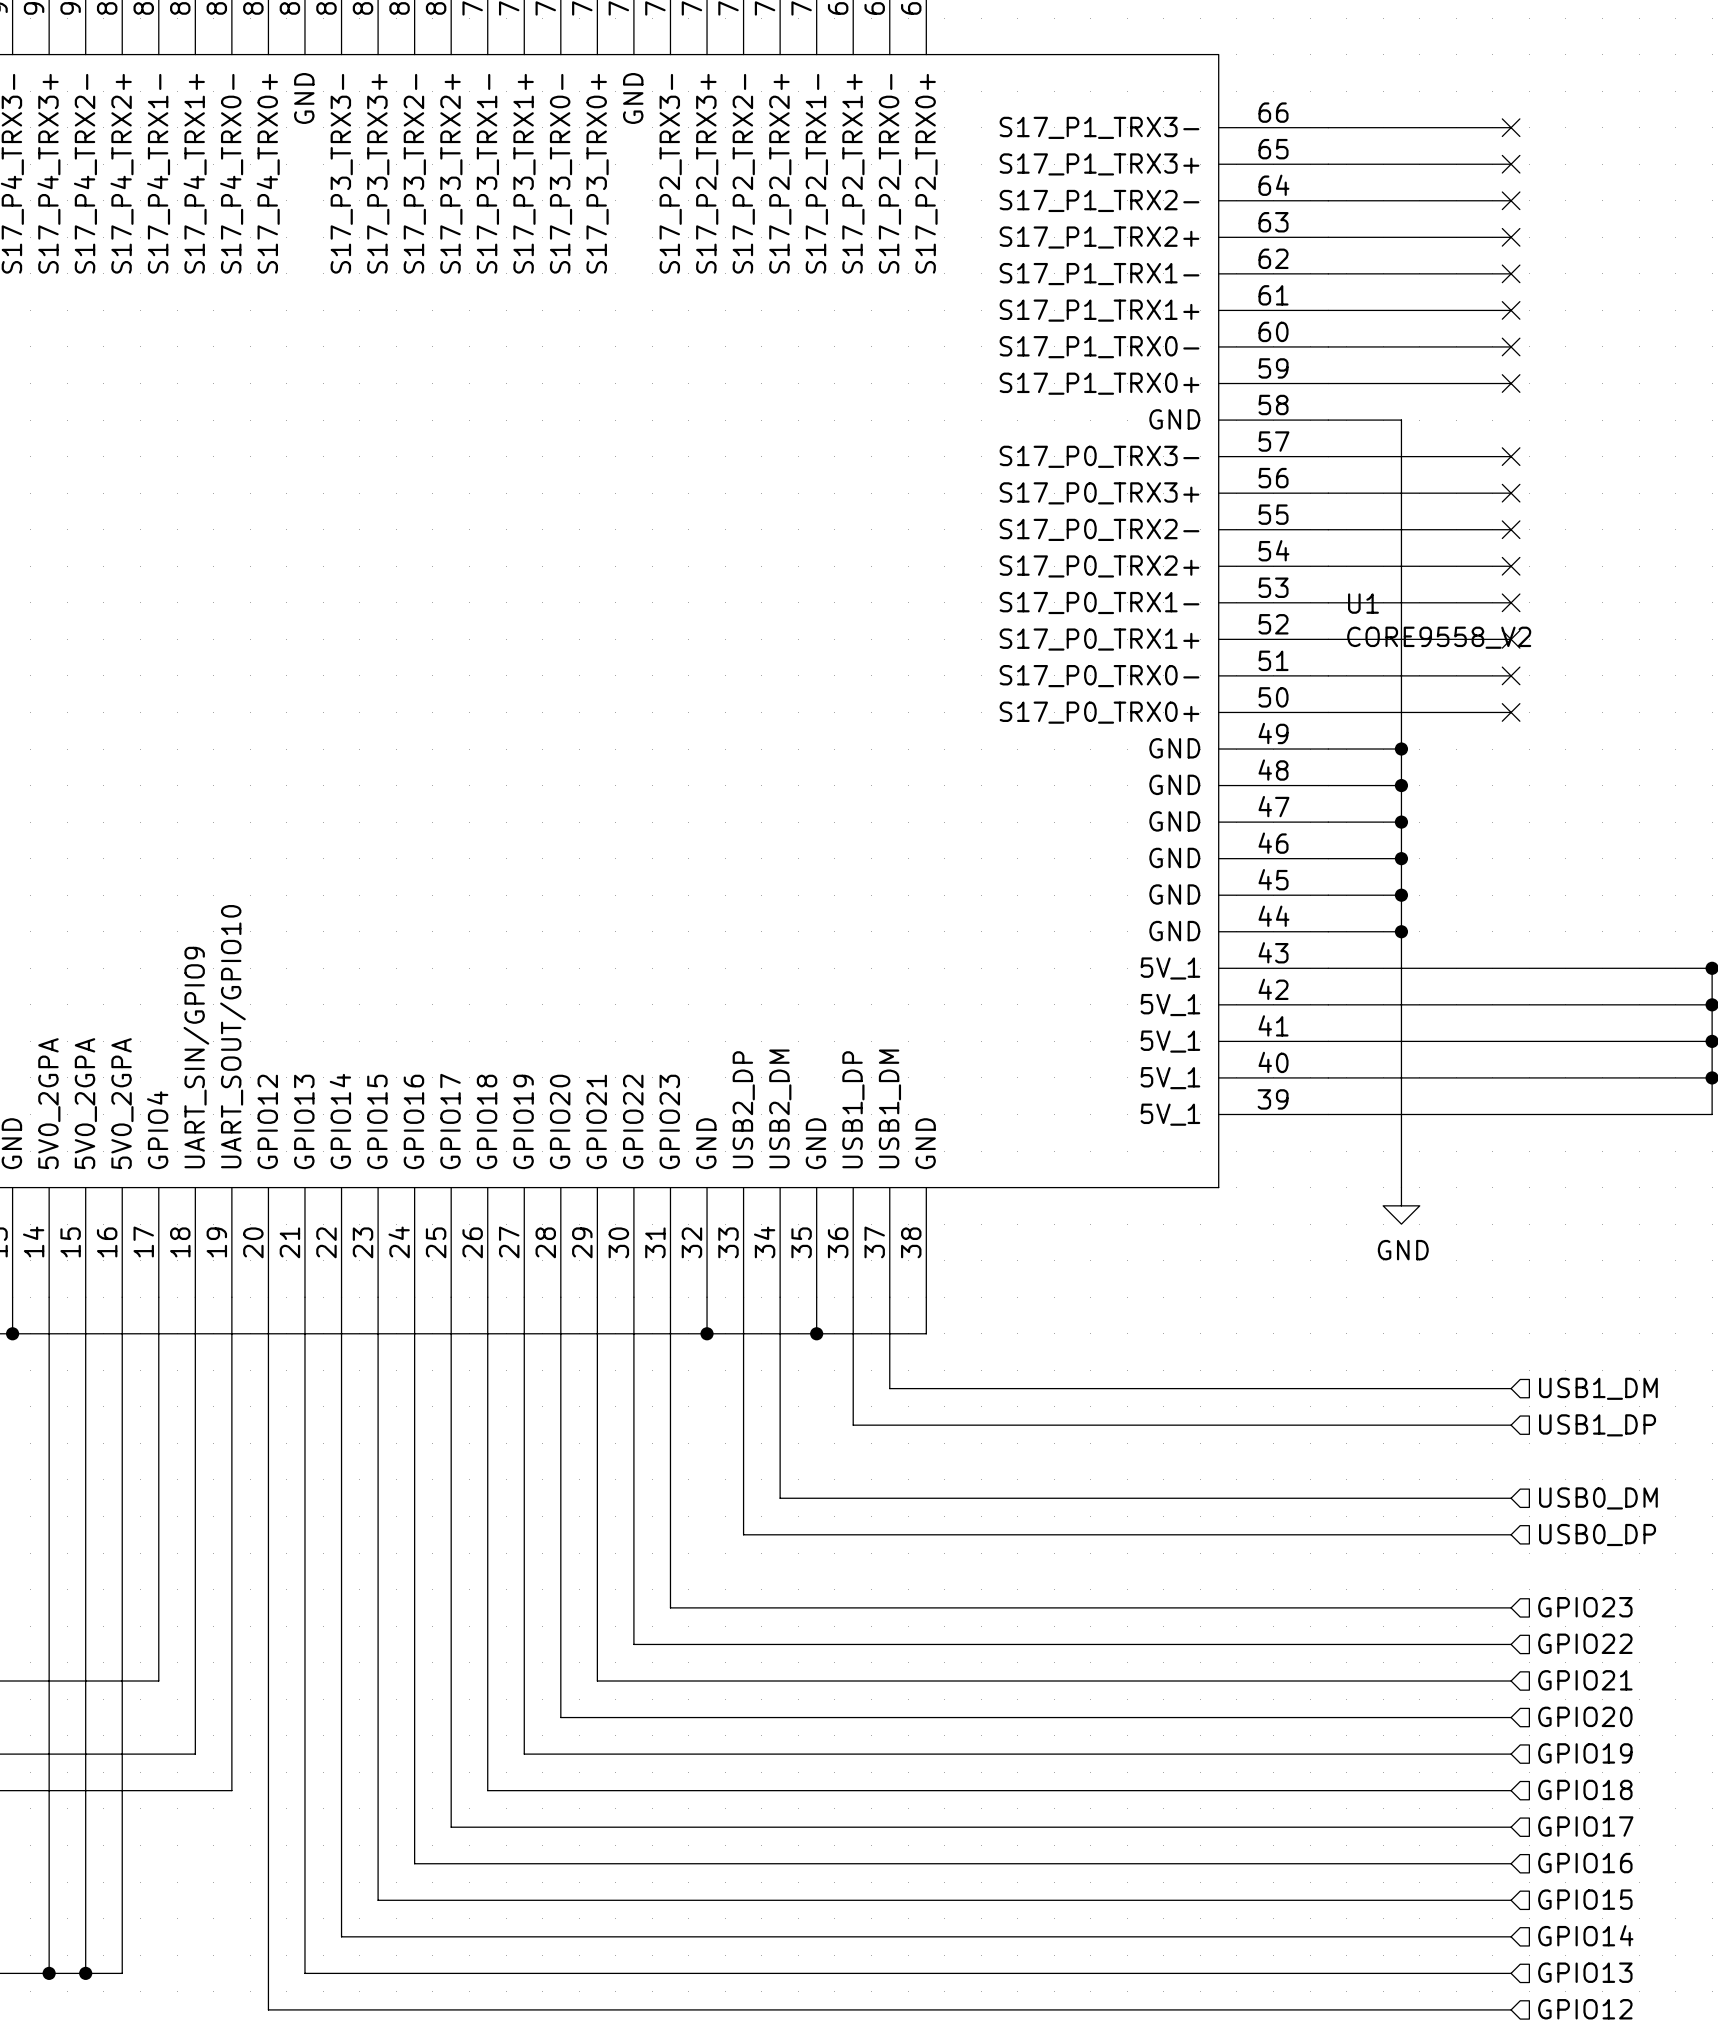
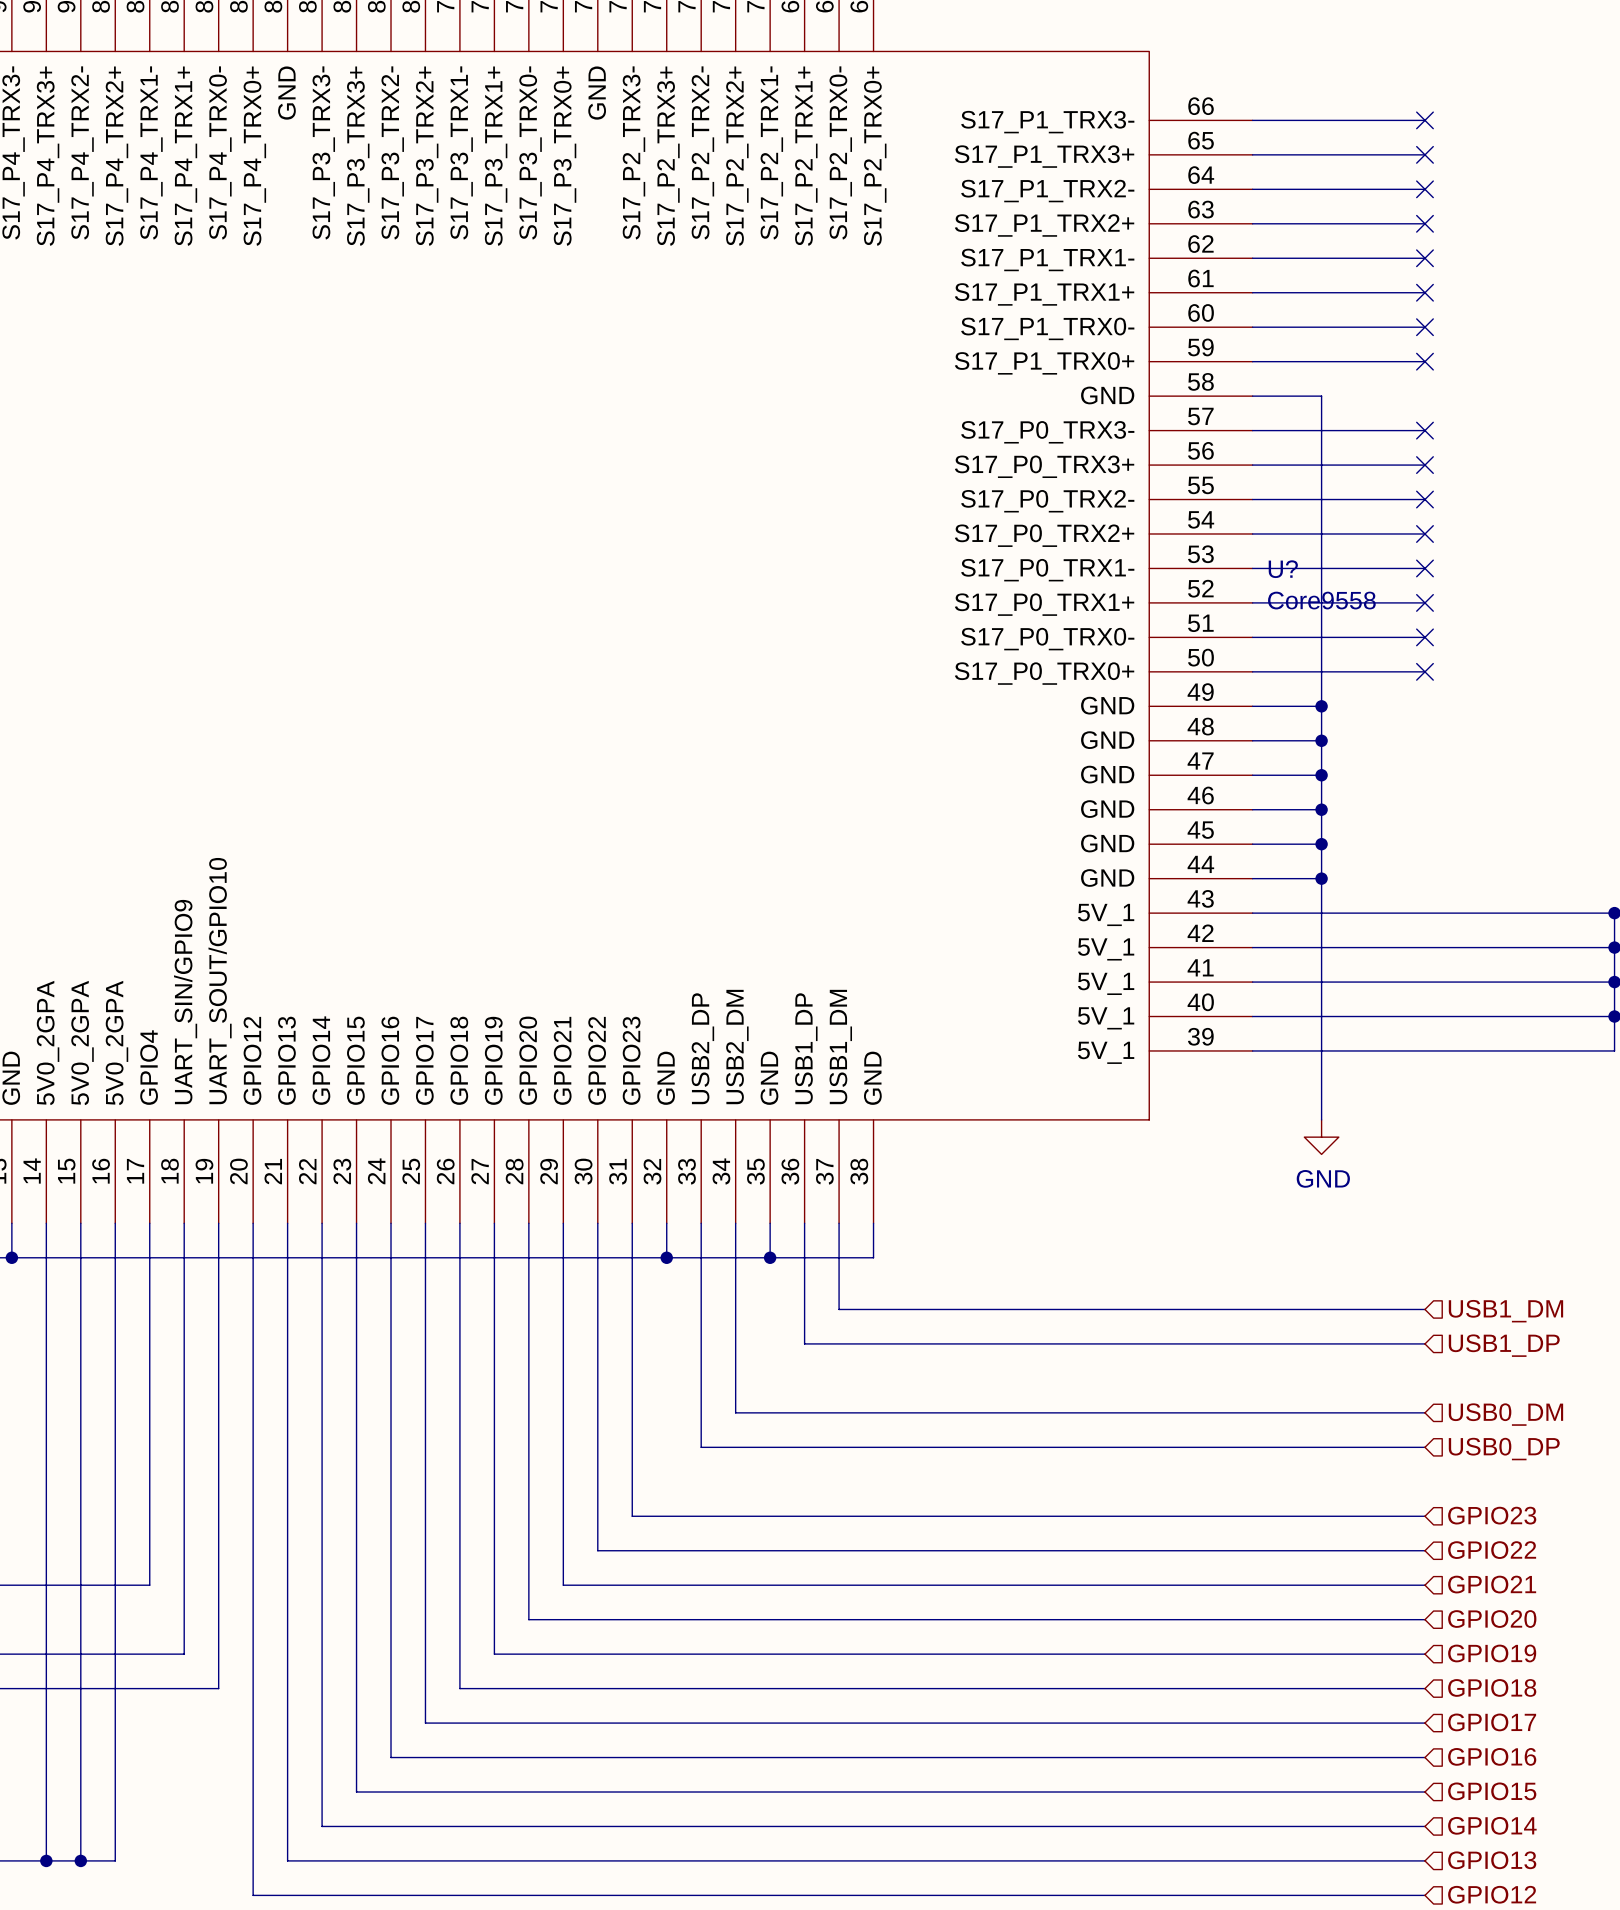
U1 name: U1 (1363, 603) -> U? (1283, 569)
U1 value: CORE9558_V2 (1439, 637) -> Core9558 (1321, 600)

